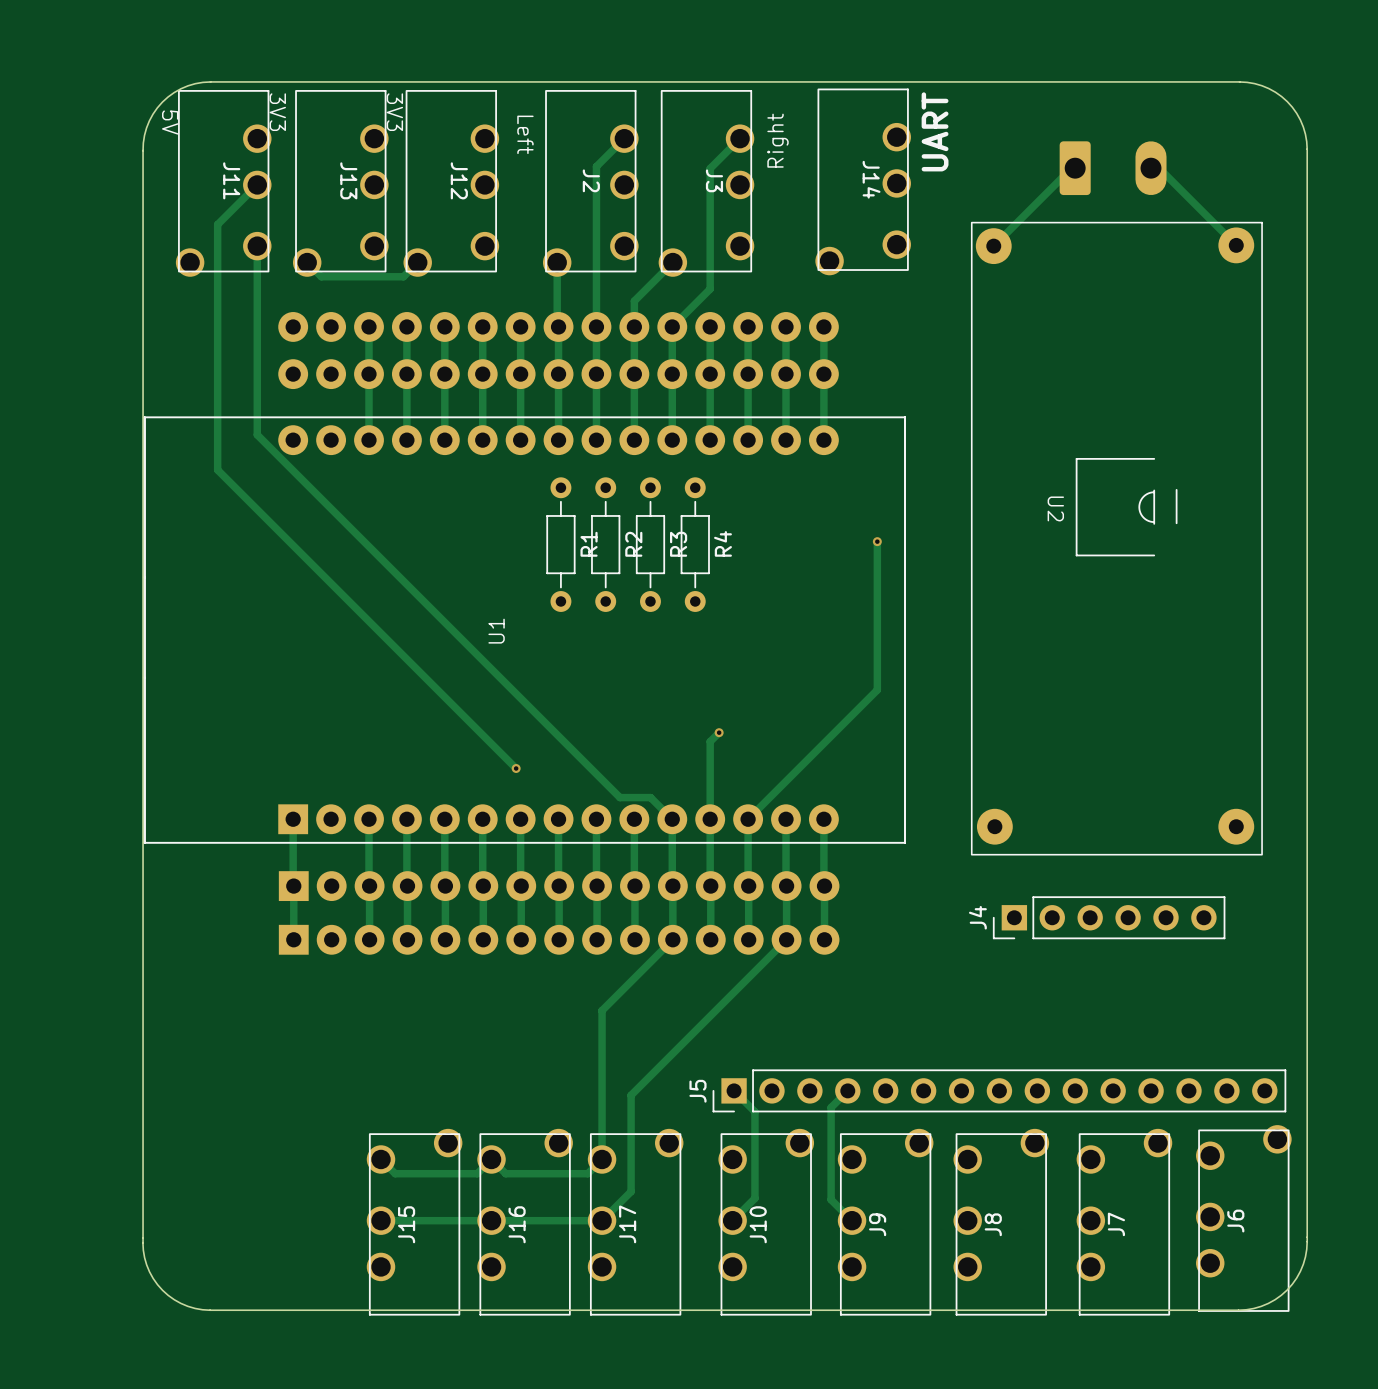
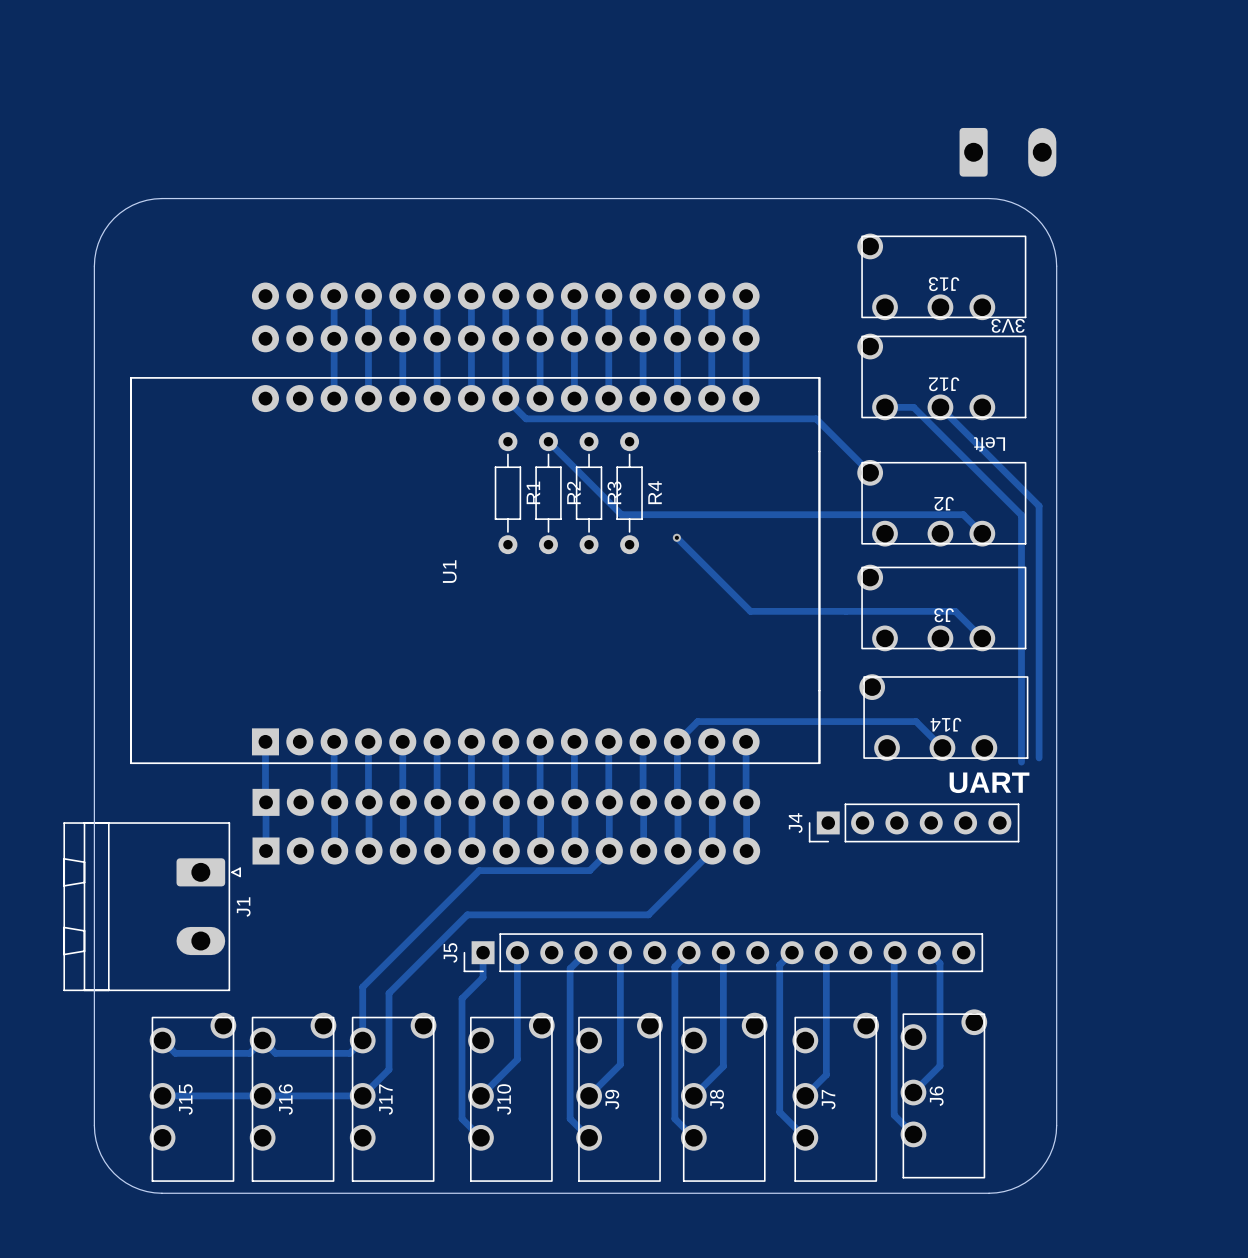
text: 3V3 (277, 112) -> none
text: 3V3 (394, 112) -> none
text: 5V (170, 122) -> none
text: UART (935, 131) -> none
text: Left (525, 134) -> none
track: (624, 138) (596, 166) (596, 326) -> none
track: (740, 138) (710, 168) (710, 289) (672, 326) -> none
text: Right (778, 140) -> none
track: (1075, 168) (1071, 168) (993, 246) -> none
track: (1151, 168) (1159, 168) (1236, 245) -> none
J14 rotation: 0° (863, 181) -> 90° clockwise (943, 717)
J14 position: (863, 181) -> (943, 717)
J11: (223, 183) -> none
J13 rotation: 0° (340, 183) -> 90° clockwise (941, 276)
J13 position: (340, 183) -> (941, 276)
J12 rotation: 0° (451, 183) -> 90° clockwise (941, 376)
J12 position: (451, 183) -> (941, 376)
J2 rotation: 0° (590, 183) -> 90° clockwise (941, 503)
J2 position: (590, 183) -> (941, 503)
J3 rotation: 0° (706, 183) -> 90° clockwise (941, 607)
J3 position: (706, 183) -> (941, 607)
track: (257, 184) (217, 224) (217, 470) (516, 768) -> none
track: (257, 246) (257, 434) (619, 797) (650, 797) (672, 819) -> none
track: (307, 262) (321, 276) (403, 276) (417, 262) -> none
track: (557, 262) (557, 325) -> none
track: (672, 262) (634, 301) (634, 326) -> none
text: none -> 3V3 (1008, 325)
track: none -> (505, 398) (526, 418) (816, 418) (870, 472)
track: none -> (885, 407) (913, 407) (1021, 515) (1021, 762)
track: none -> (940, 407) (1039, 506) (1039, 757)
track: none -> (548, 441) (621, 514) (963, 514) (982, 533)
text: none -> Left (989, 444)
U2: (1116, 538) -> none
track: (877, 541) (877, 690) (770, 796) -> (942, 747) (916, 721) (697, 721)
via: (877, 541) -> none
track: none -> (676, 537) (750, 611) (955, 611) (982, 638)
via: none -> (676, 537)
track: (719, 732) (710, 741) (710, 819) -> none
via: (719, 732) -> none
via: (516, 768) -> none
text: none -> UART (989, 782)
J4 position: (1109, 917) -> (914, 822)
track: (651, 961) (601, 1010) -> (589, 870) (479, 870) (362, 987) (362, 1040) (349, 1053) (275, 1053) (262, 1040) (249, 1053) (175, 1053) (162, 1040)
J1: none -> (152, 906)
track: (602, 1010) (602, 1159) (587, 1173) (505, 1173) (491, 1159) (477, 1173) (395, 1173) (381, 1159) -> none
track: (716, 1010) (631, 1095) (631, 1191) (602, 1220) (381, 1220) -> (648, 914) (467, 914) (389, 993) (389, 1069) (362, 1095) (162, 1095)
track: none -> (483, 952) (483, 977) (462, 998) (462, 1118) (480, 1137)
track: none -> (517, 952) (517, 1059) (480, 1095)
track: none -> (586, 952) (570, 968) (570, 1118) (589, 1137)
track: none -> (620, 952) (620, 1064) (589, 1095)
track: none -> (689, 952) (674, 966) (674, 1118) (693, 1137)
track: none -> (723, 952) (723, 1066) (693, 1095)
track: none -> (792, 952) (779, 965) (779, 1112) (805, 1137)
track: none -> (826, 952) (826, 1074) (805, 1095)
track: none -> (895, 952) (894, 1115) (913, 1134)
track: none -> (929, 952) (940, 963) (940, 1065) (913, 1092)
track: (734, 1090) (754, 1111) (754, 1198) (732, 1220) -> none
track: (847, 1090) (831, 1107) (831, 1199) (852, 1220) -> none
J5 position: (999, 1090) -> (723, 952)
J6 position: (1243, 1218) -> (943, 1093)
J15 position: (414, 1222) -> (192, 1097)
J16 position: (525, 1222) -> (293, 1097)
J17 position: (635, 1222) -> (393, 1097)
J10 position: (766, 1222) -> (511, 1097)
J9 position: (885, 1222) -> (619, 1097)
J8 position: (1001, 1222) -> (724, 1097)
J7 position: (1124, 1222) -> (835, 1097)
board edge: (142, 1242) (144, 1257) (149, 1271) (162, 1290) (174, 1299) (187, 1306) (210, 1310) (1238, 1310) (1261, 1306) (1275, 1299) (1287, 1290) (1300, 1271) (1305, 1256) (1307, 1241) (1307, 149) (1305, 134) (1300, 119) (1287, 101) (1275, 92) (1261, 85) (1239, 81) (210, 81) (188, 85) (174, 92) (162, 102) (149, 120) (144, 135) (143, 150) (143, 1242) -> (161, 198) (139, 202) (126, 208) (114, 218) (101, 236) (96, 251) (94, 266) (94, 1125) (98, 1148) (109, 1167) (119, 1178) (132, 1186) (146, 1191) (161, 1193) (989, 1193) (1011, 1189) (1031, 1178) (1041, 1167) (1049, 1155) (1054, 1140) (1056, 1125) (1056, 266) (1052, 243) (1041, 223) (1031, 213) (1018, 205) (1004, 200) (989, 198) (161, 198)

